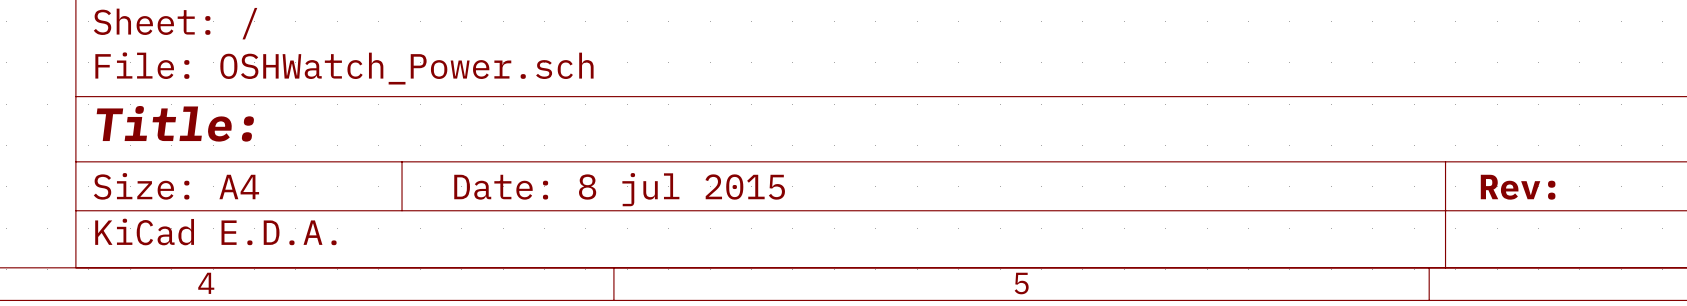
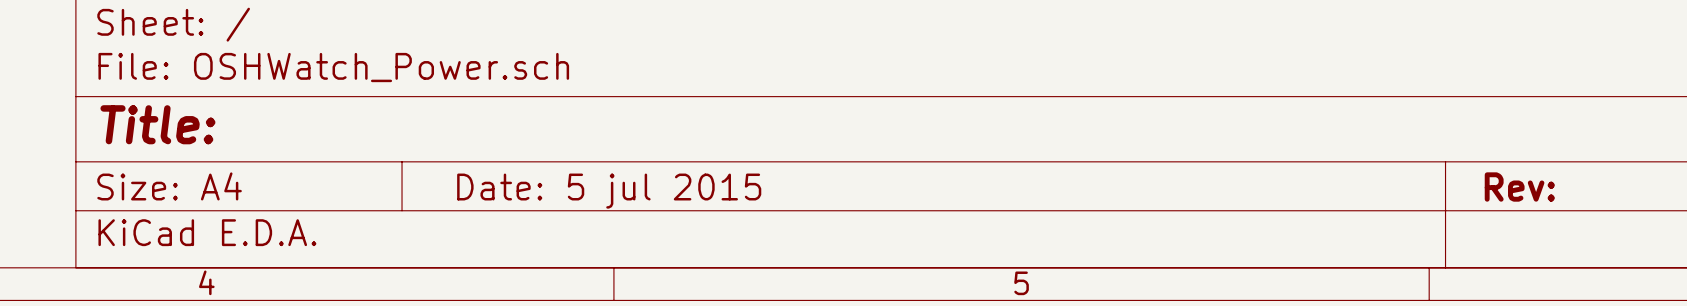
title block: Date: 8 jul 2015 (619, 189) -> Date: 5 jul 2015 (609, 191)

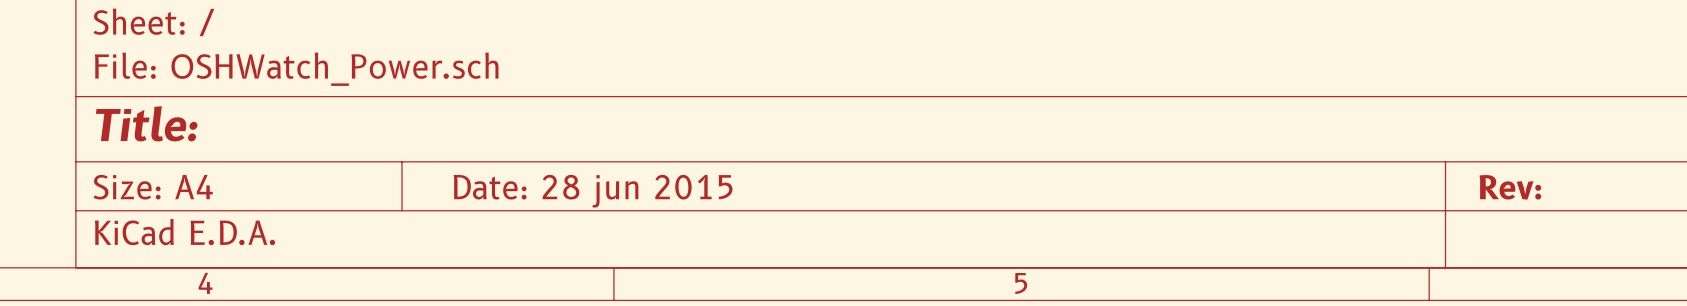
title block: Date: 5 jul 2015 (609, 191) -> Date: 28 jun 2015 (593, 191)

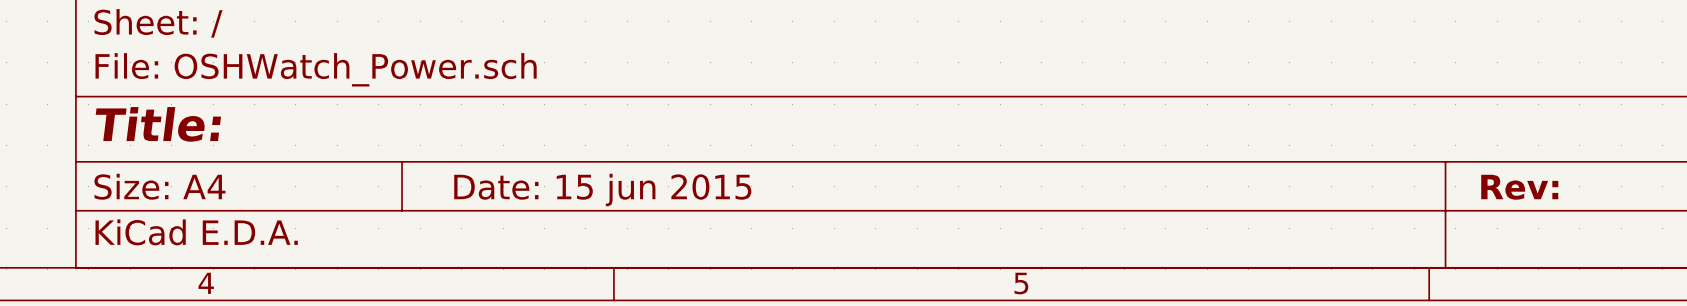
title block: Date: 28 jun 2015 (593, 191) -> Date: 15 jun 2015 (602, 189)

